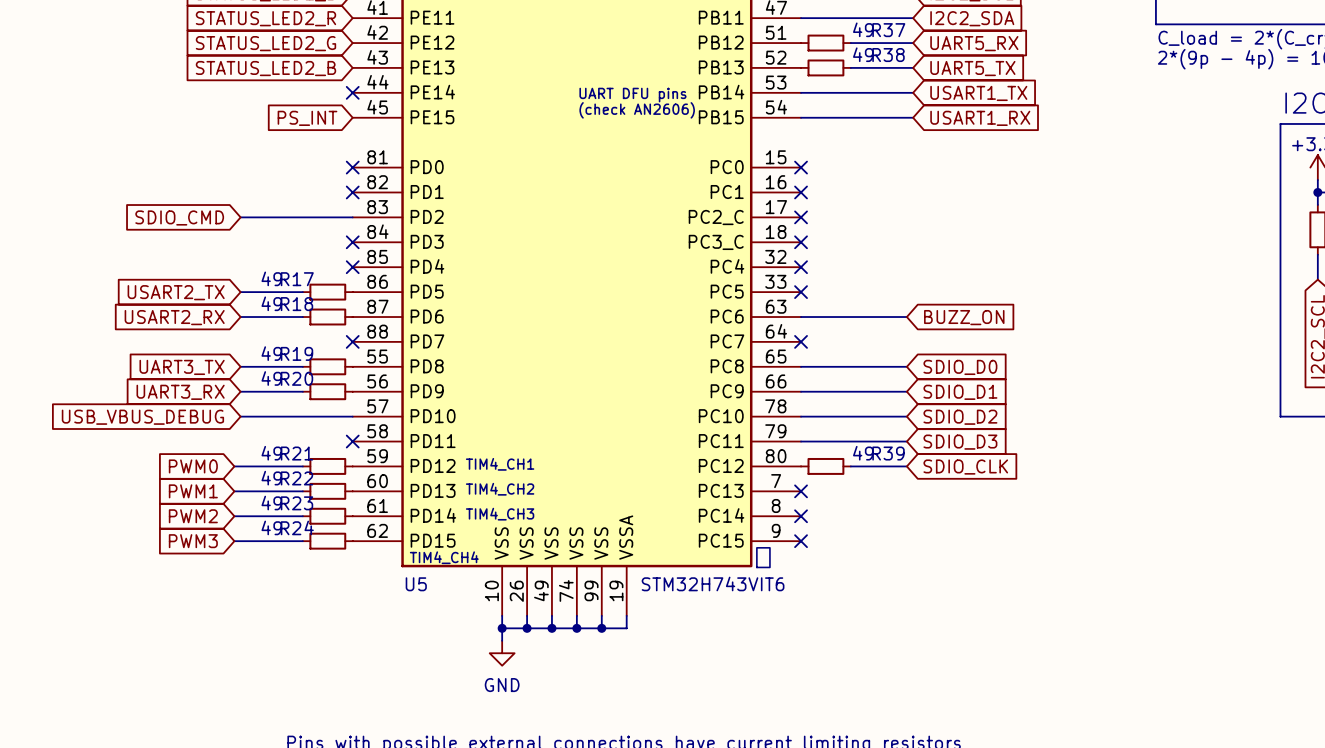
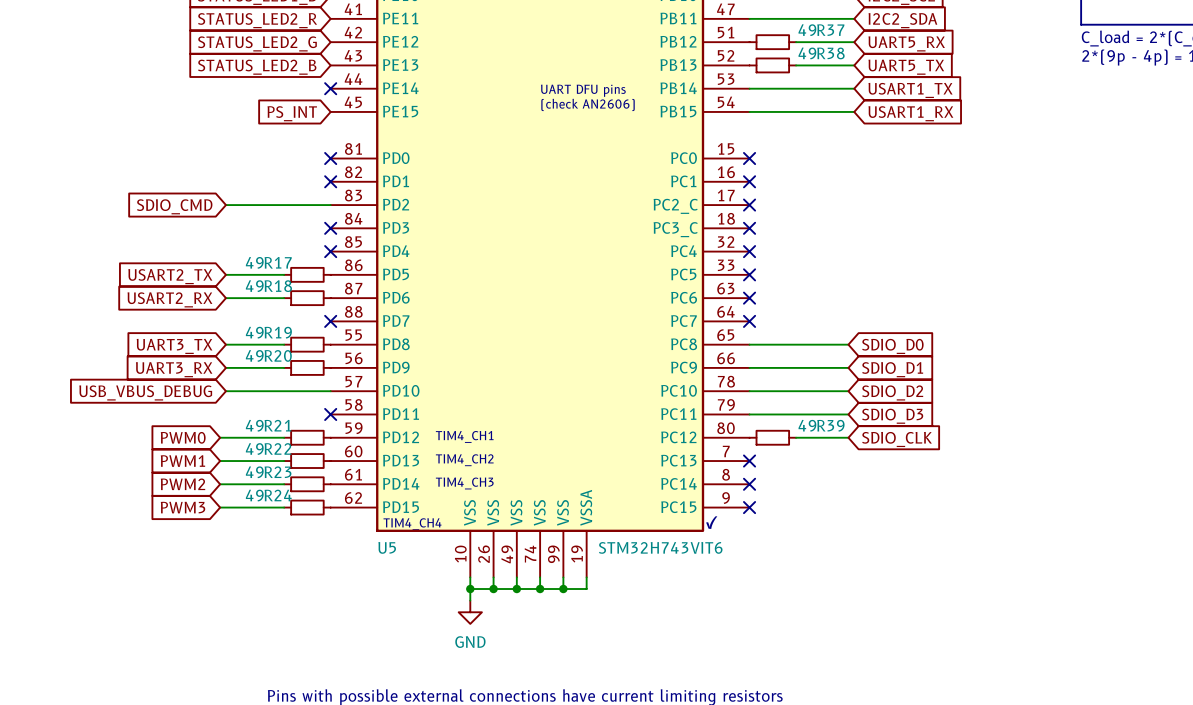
wire: (801, 317) (906, 317) -> none
no-connect mark: none -> (749, 298)
global label: BUZZ_ON (964, 317) -> none

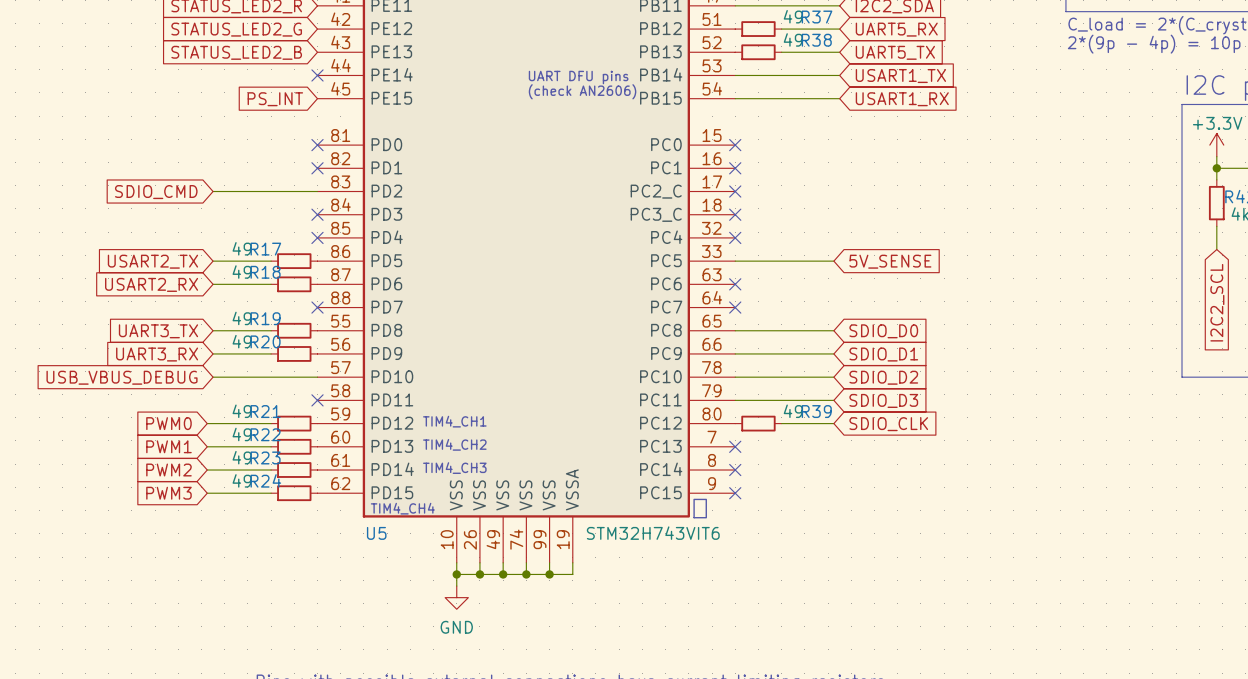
wire: none -> (735, 261) (833, 261)
no-connect mark: (749, 274) -> none
global label: none -> 5V_SENSE (890, 261)

